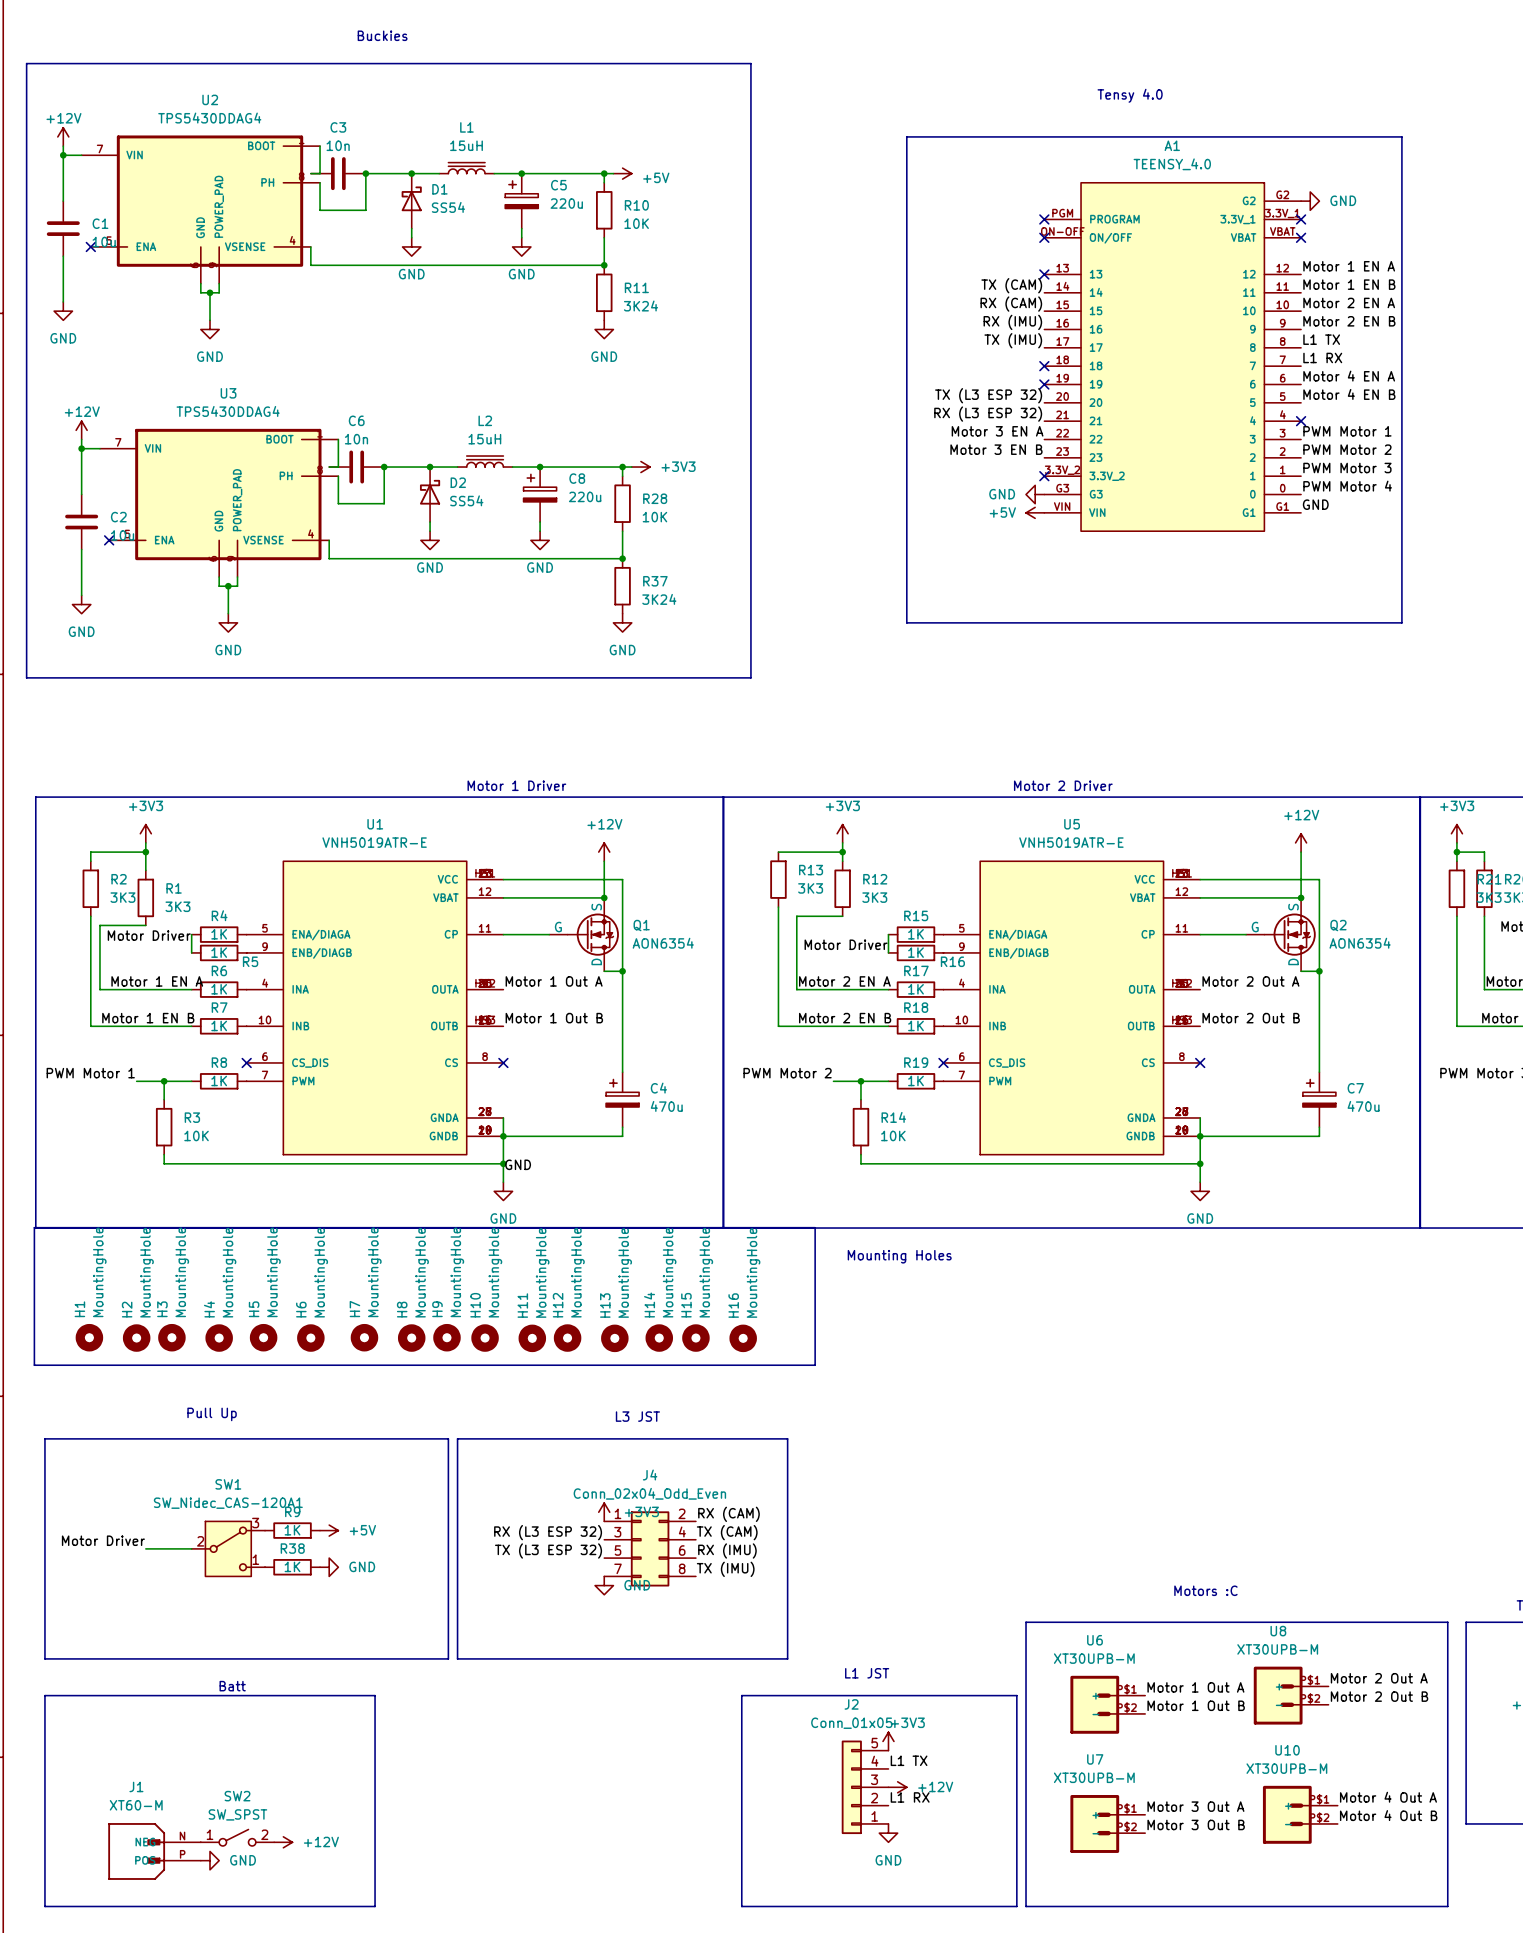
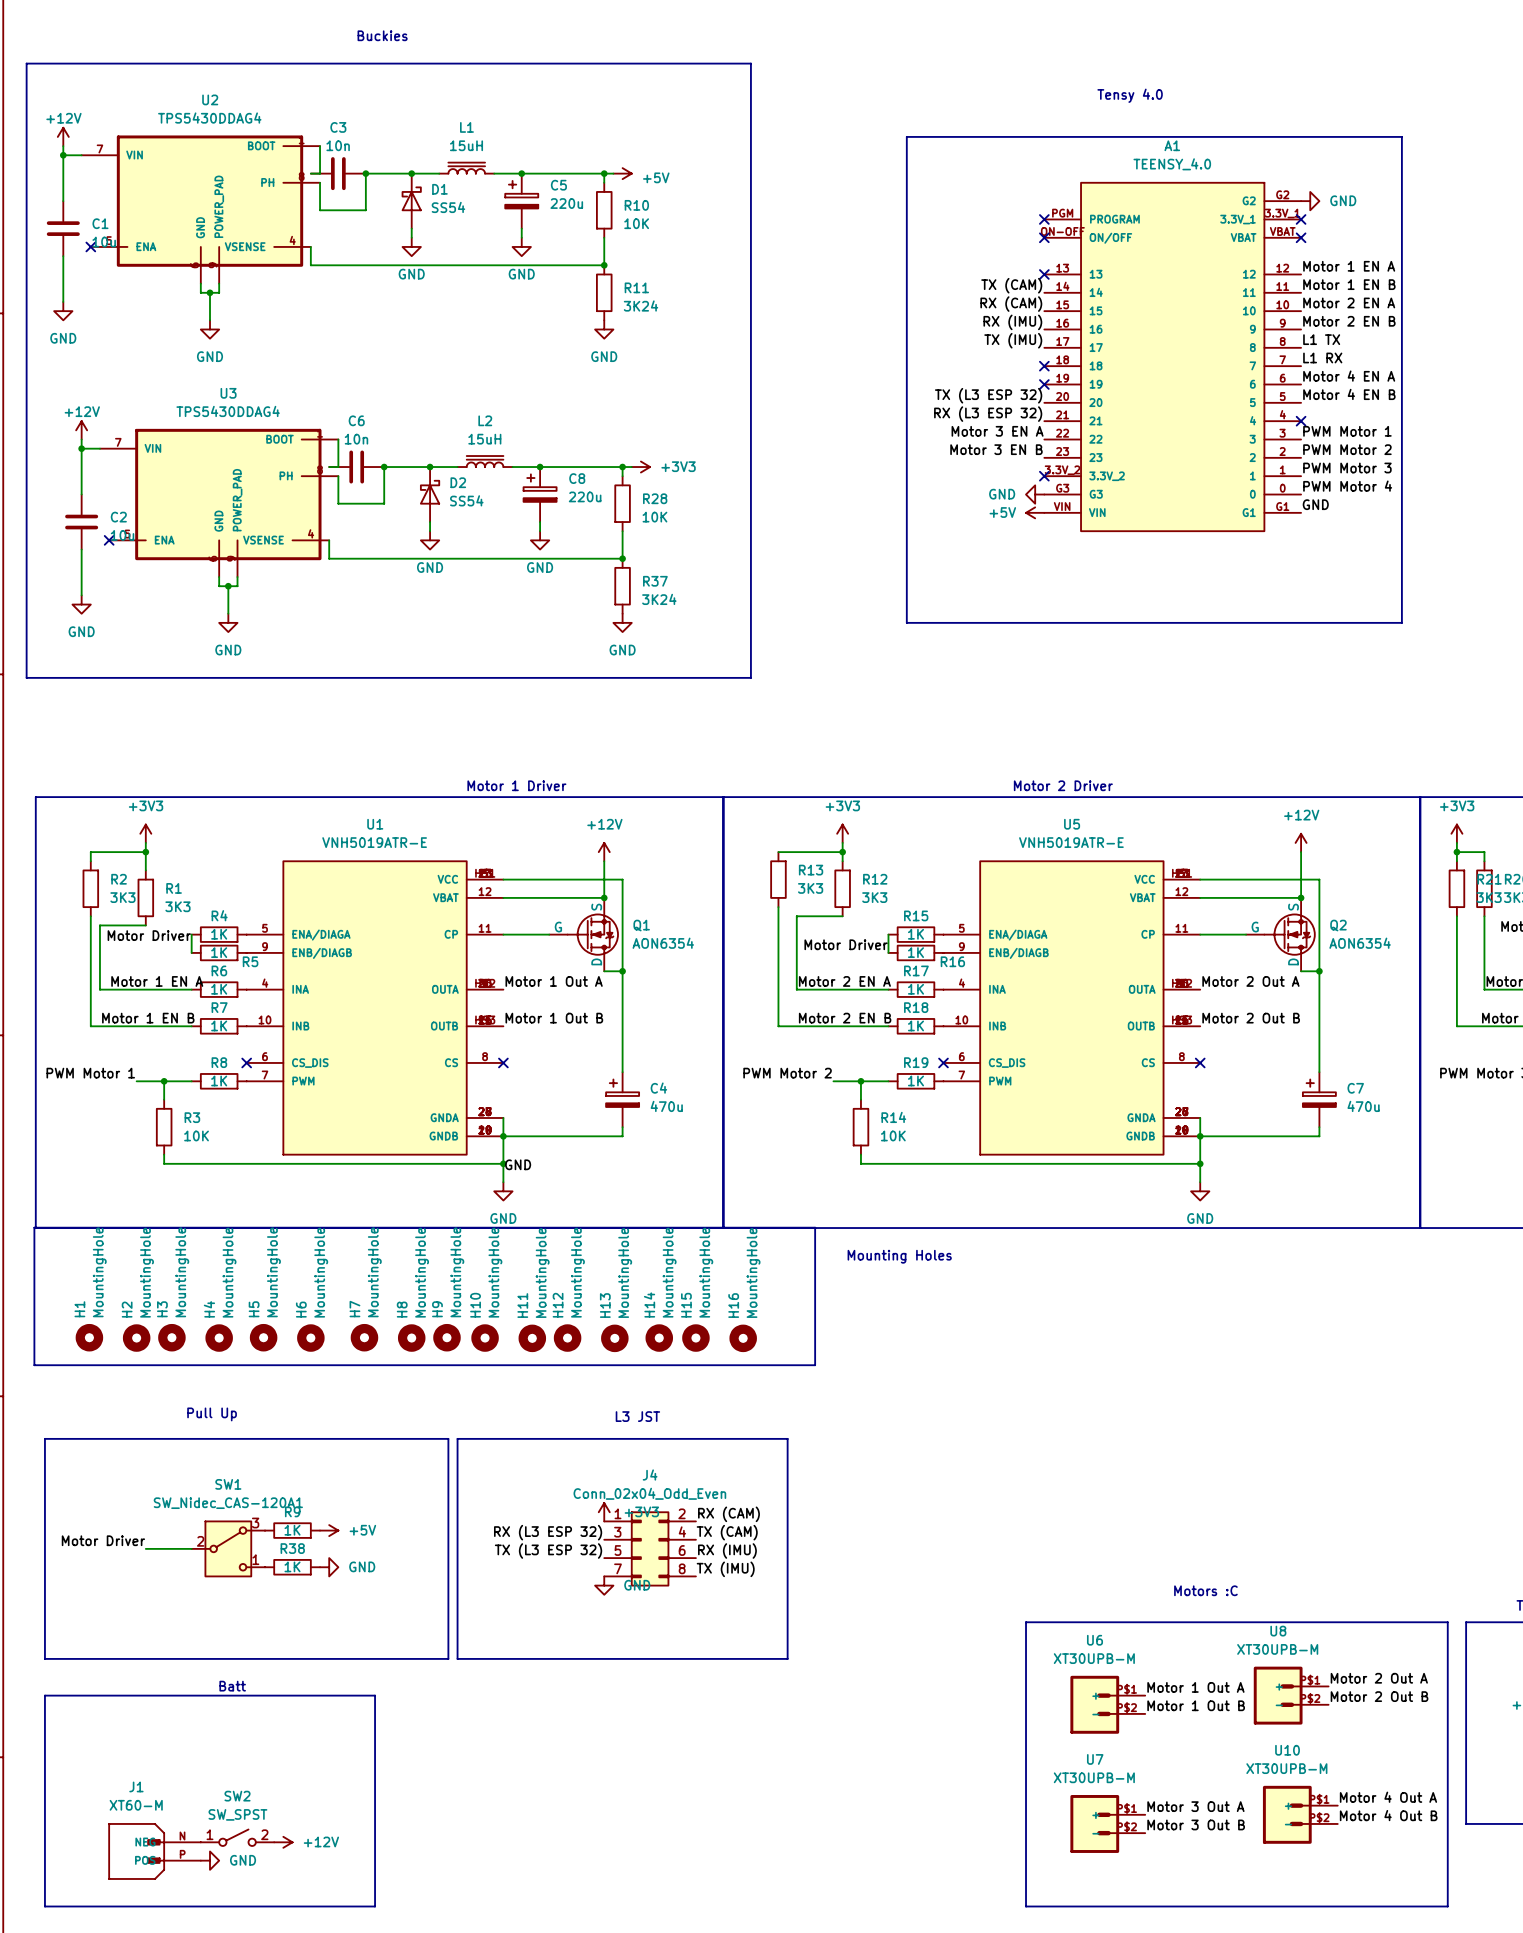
text: L1 JST (867, 1673) -> none
line: (741, 1695) (1016, 1695) (1016, 1906) (741, 1906) (741, 1695) -> none
power symbol: +3V3 (888, 1741) -> none
label: L1 TX (909, 1760) -> none
J2: Conn_01x05 (865, 1787) -> none
power symbol: +12V (897, 1787) -> none
label: L1 RX (910, 1797) -> none
power symbol: GND (888, 1833) -> none

